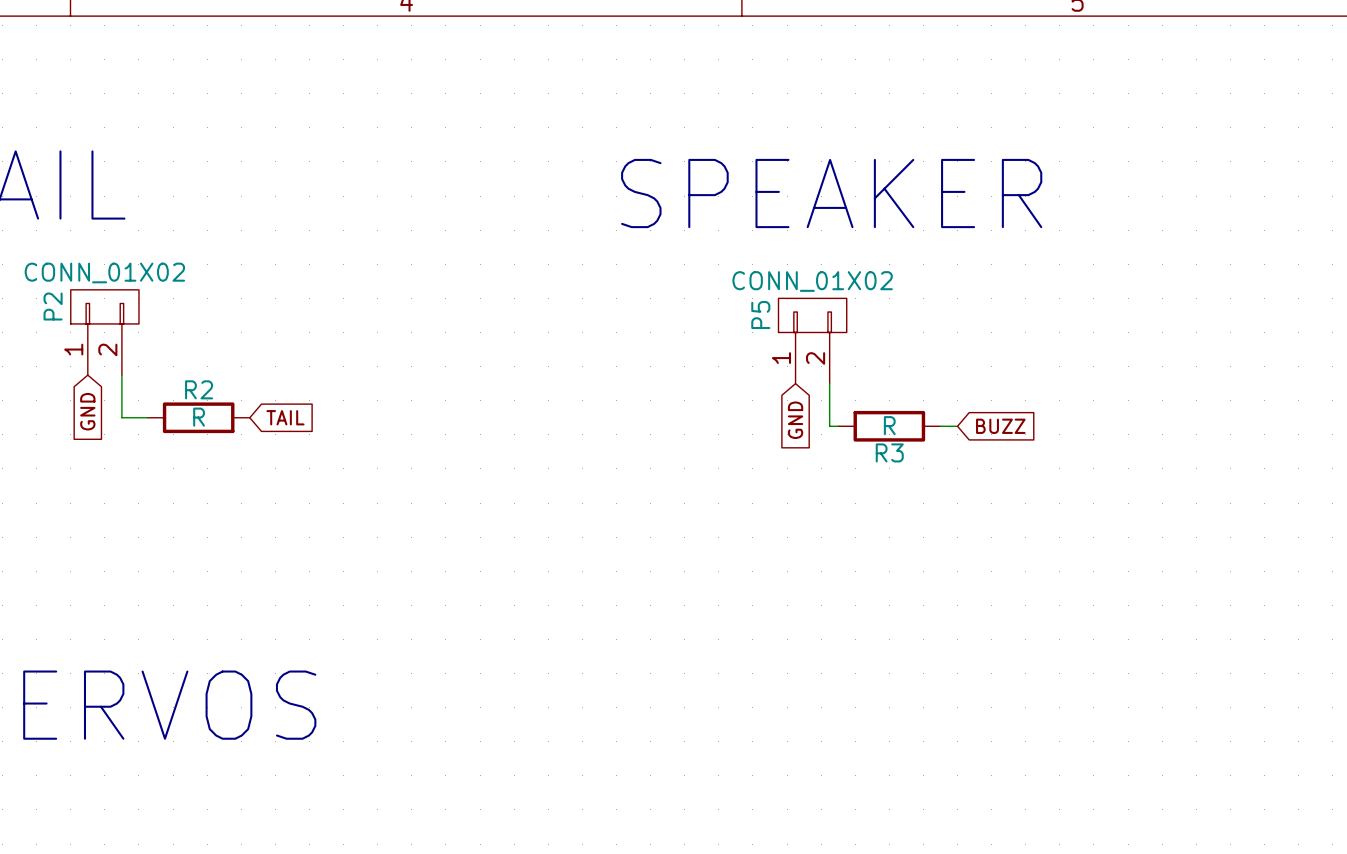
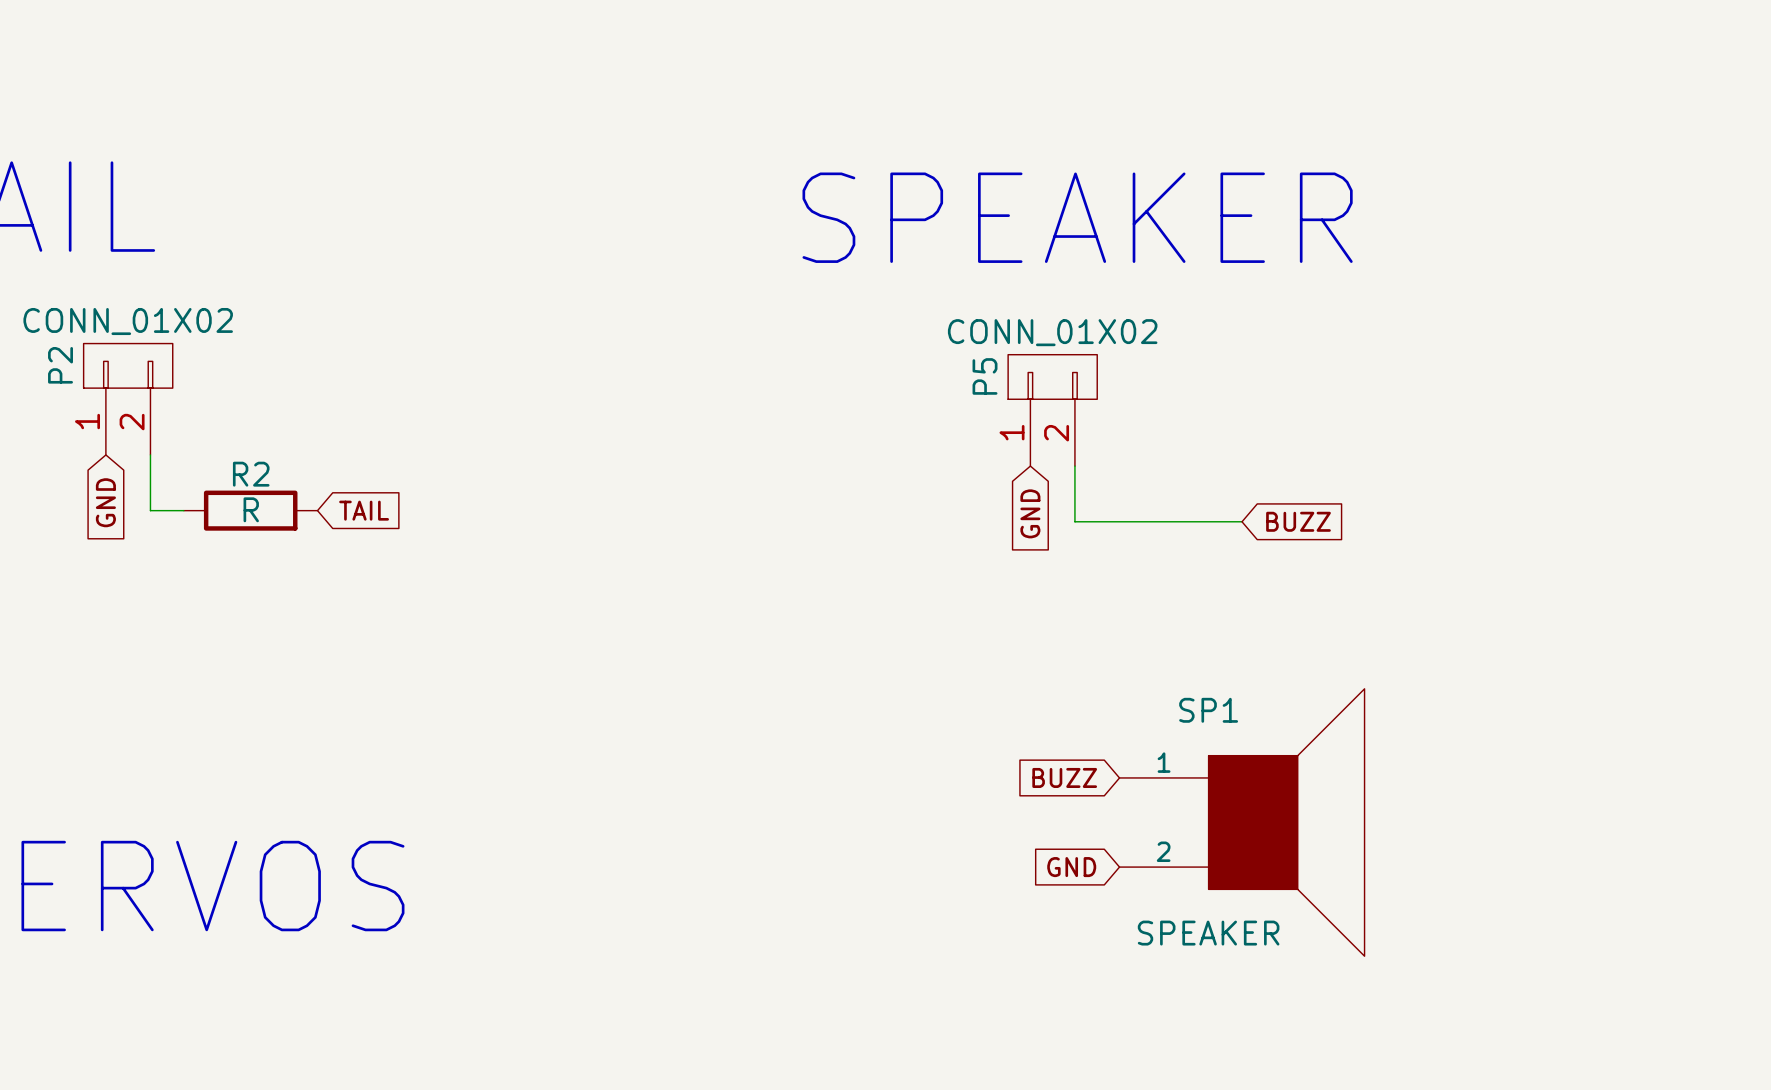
wire: none -> (1086, 521) (1219, 521)
R3: R (889, 426) -> none
global label: none -> BUZZ (1064, 777)
SP1: none -> SPEAKER (1242, 822)
global label: none -> GND (1071, 867)

